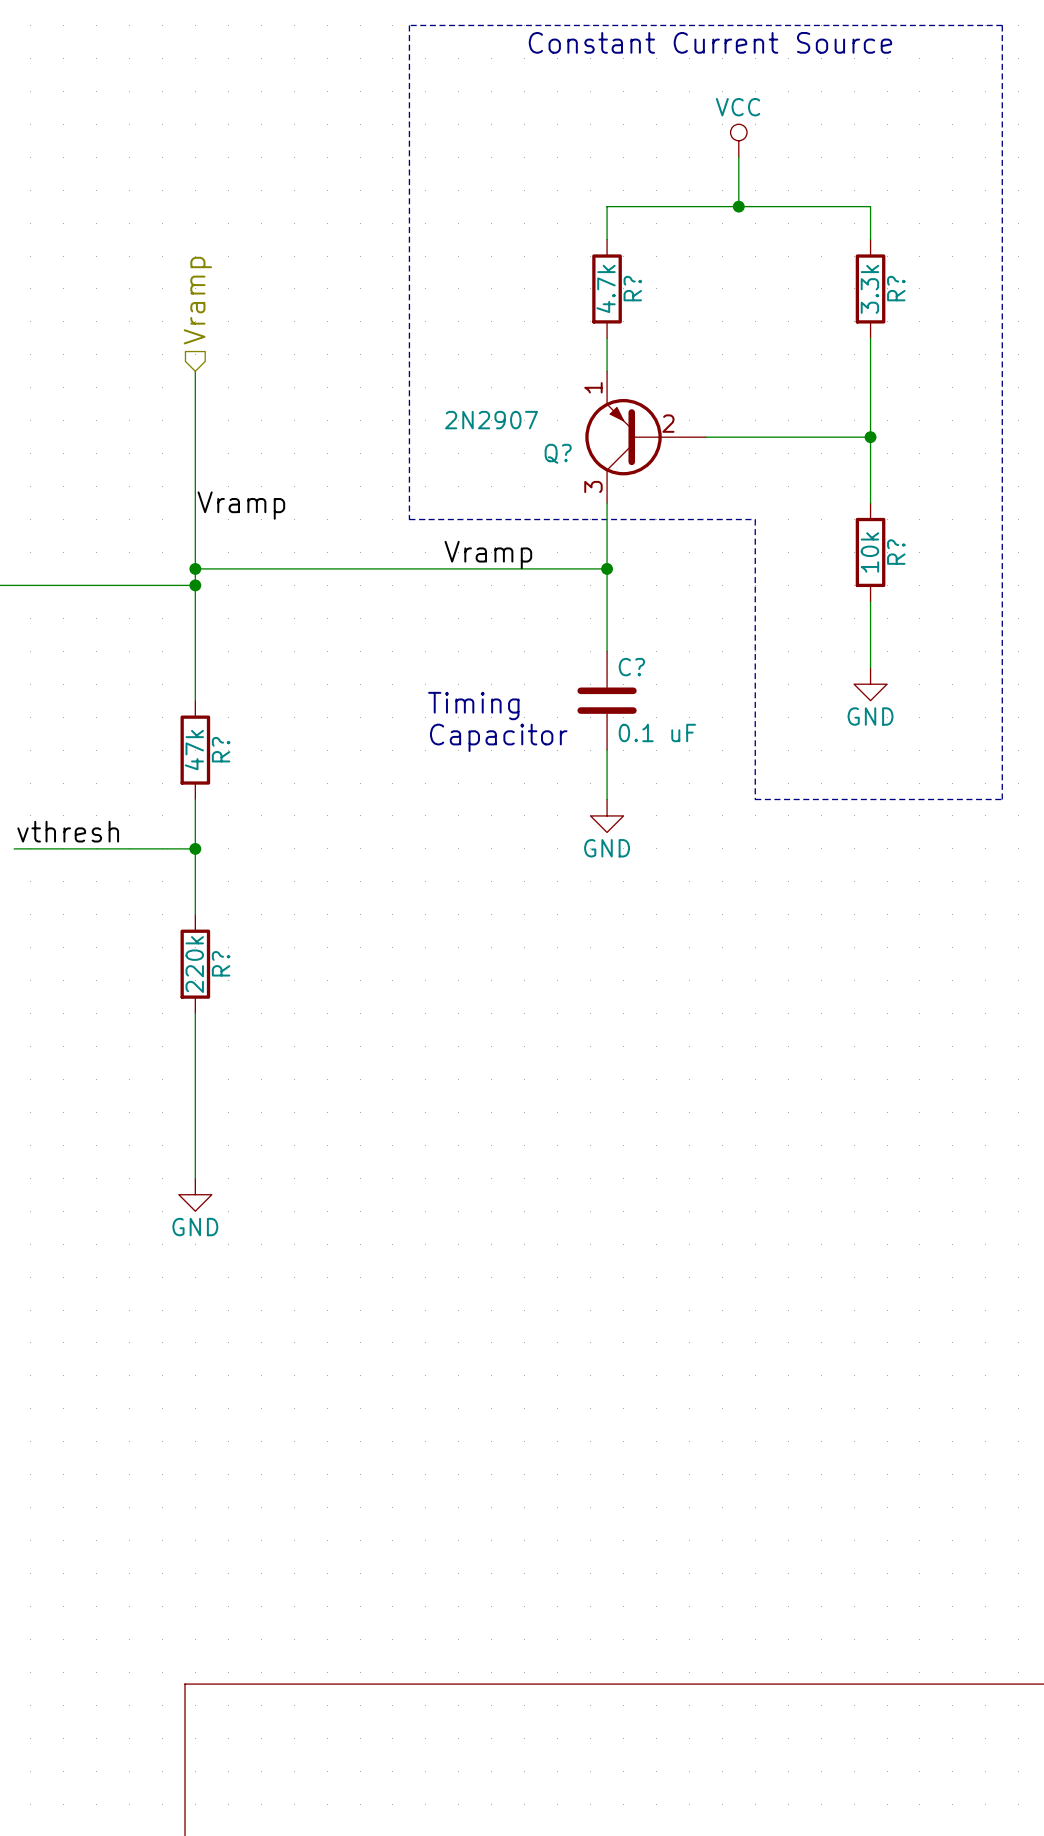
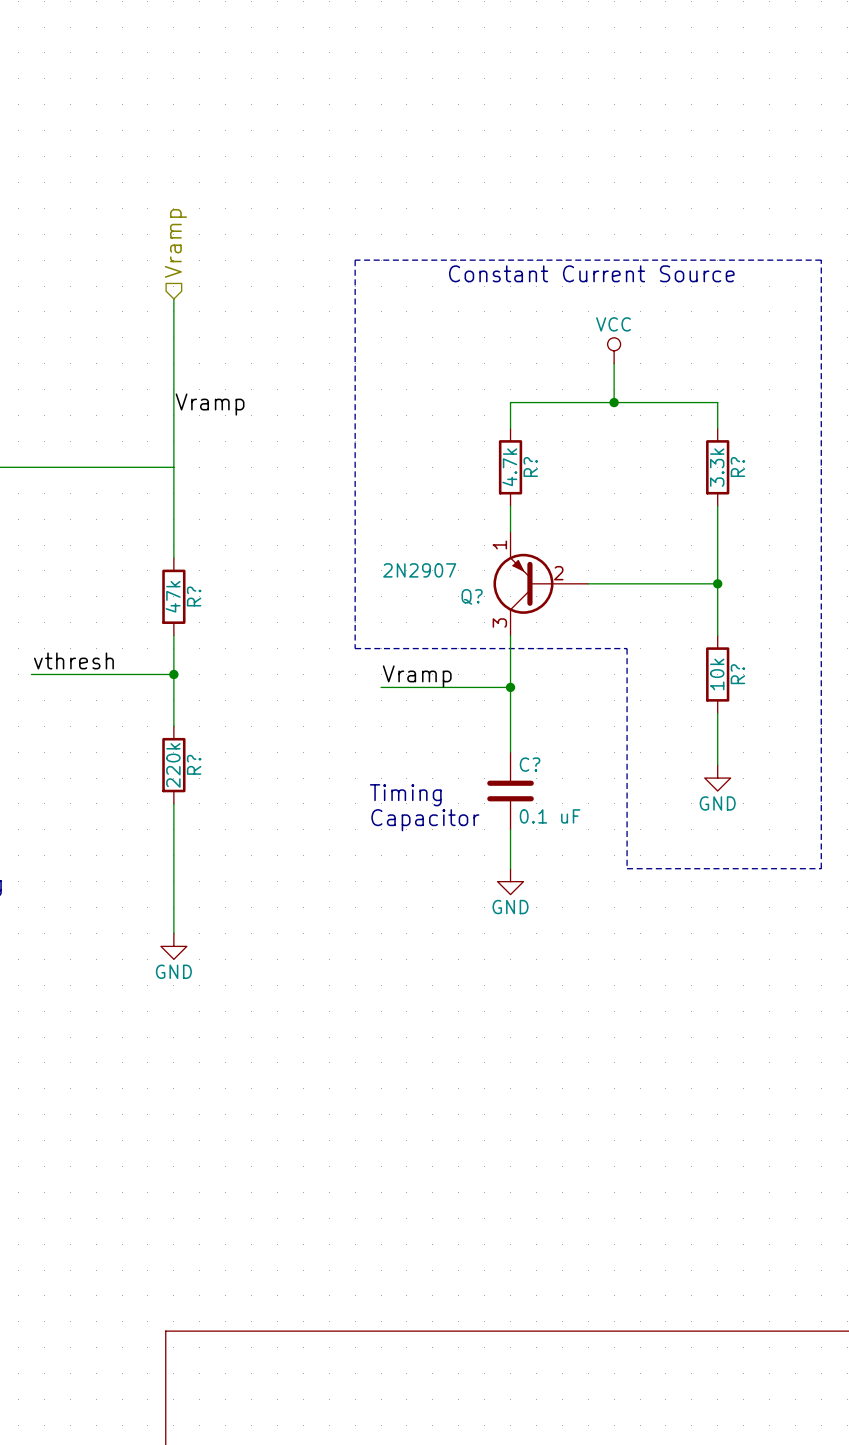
line: (409, 25) (1002, 25) (1002, 799) (755, 799) (755, 519) (409, 519) (409, 25) -> (355, 260) (821, 260) (821, 868) (627, 868) (627, 648) (355, 648) (355, 260)
text position: Constant Current Source (710, 42) -> Constant Current Source (591, 273)
power symbol position: VCC (738, 140) -> VCC (614, 350)
wire: (738, 157) (738, 206) -> (614, 363) (614, 402)
junction: (738, 206) -> none
wire: (607, 239) (607, 206) (870, 206) (870, 239) -> (510, 428) (510, 402) (717, 402) (717, 428)
R? position: (607, 288) -> (510, 467)
R? position: (870, 288) -> (717, 467)
wire: (607, 338) (607, 371) -> (510, 506) (510, 532)
wire: (870, 338) (870, 503) -> (717, 506) (717, 635)
Q? position: (645, 437) -> (540, 583)
wire: (705, 437) (870, 437) -> (588, 583) (717, 583)
junction: (870, 437) -> none
wire: (607, 503) (607, 651) -> (510, 635) (510, 752)
junction: none -> (614, 402)
R? position: (870, 552) -> (717, 674)
label position: Vramp (488, 554) -> Vramp (417, 676)
wire: (195, 568) (607, 568) -> none
junction: (195, 568) -> none
junction: (607, 568) -> none
junction: (195, 585) -> none
wire: (870, 601) (870, 667) -> (717, 713) (717, 765)
power symbol: GND (870, 684) -> none
C? position: (607, 700) -> (510, 791)
text position: Timing (473, 706) -> Timing (405, 795)
junction: none -> (717, 583)
text position: Capacitor (498, 737) -> Capacitor (425, 820)
wire: (607, 750) (607, 799) -> (510, 829) (510, 868)
power symbol: GND (607, 815) -> none
wire: none -> (381, 687) (510, 687)
junction: none -> (510, 687)
power symbol: none -> GND (717, 778)
power symbol: none -> GND (510, 881)

